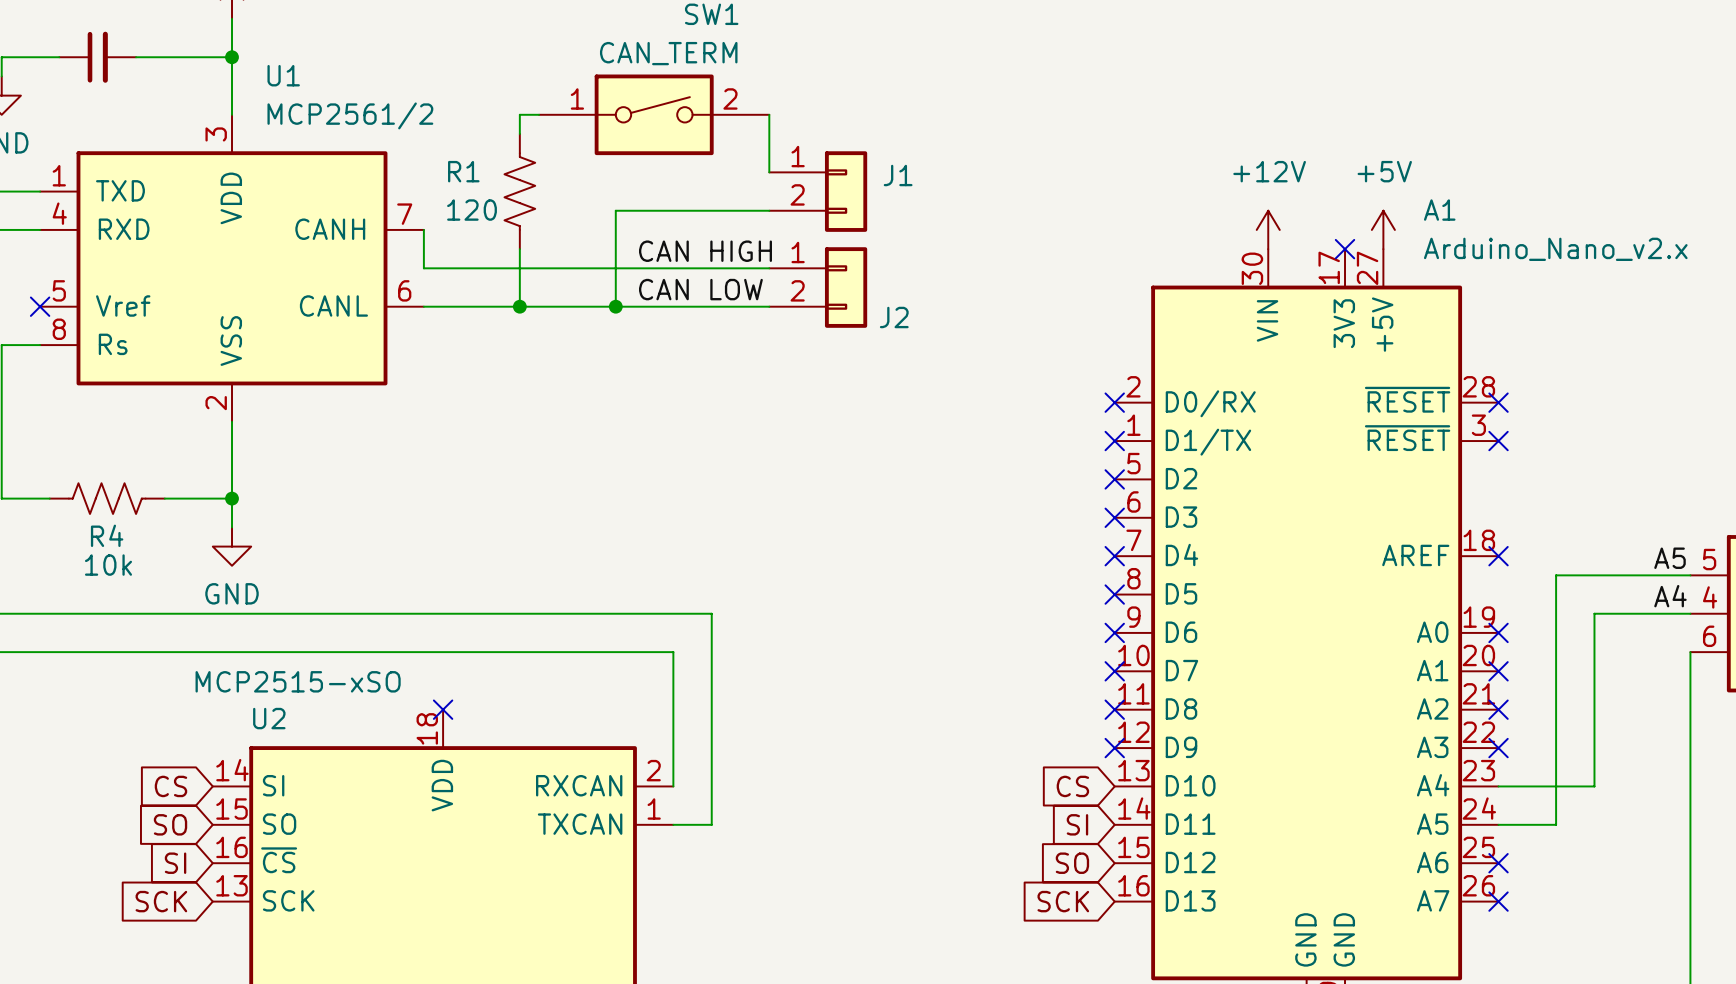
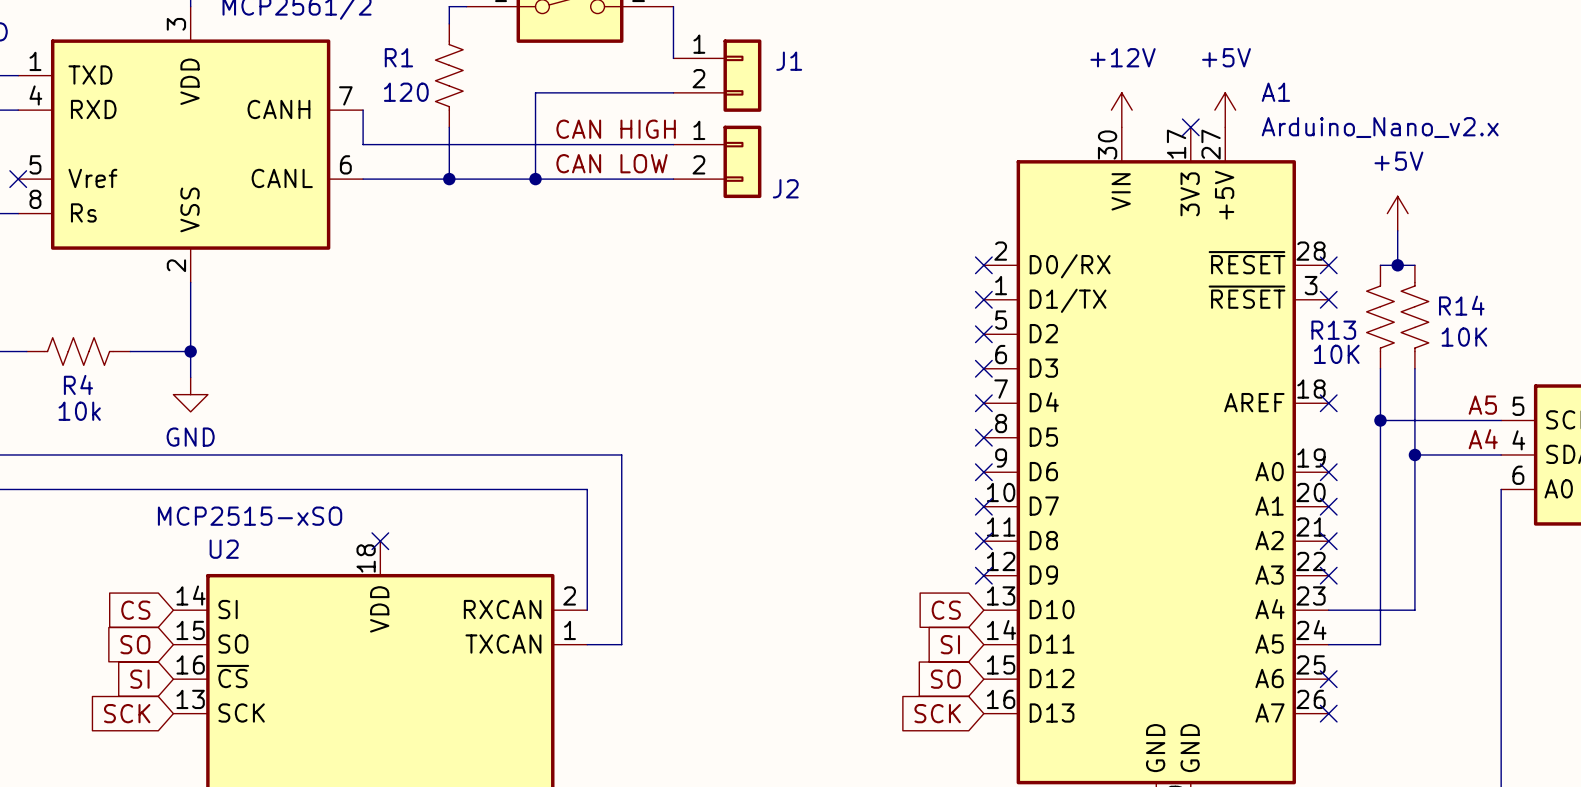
power symbol: none -> +5V (1397, 213)
wire: none -> (1397, 230) (1397, 265)
wire: none -> (1380, 265) (1414, 265)
junction: none -> (1397, 265)
R13: none -> 10K (1380, 317)
R14: none -> 10K (1414, 317)
wire: none -> (1380, 368) (1380, 420)
wire: none -> (1414, 368) (1414, 454)
junction: none -> (1380, 420)
junction: none -> (1414, 454)

